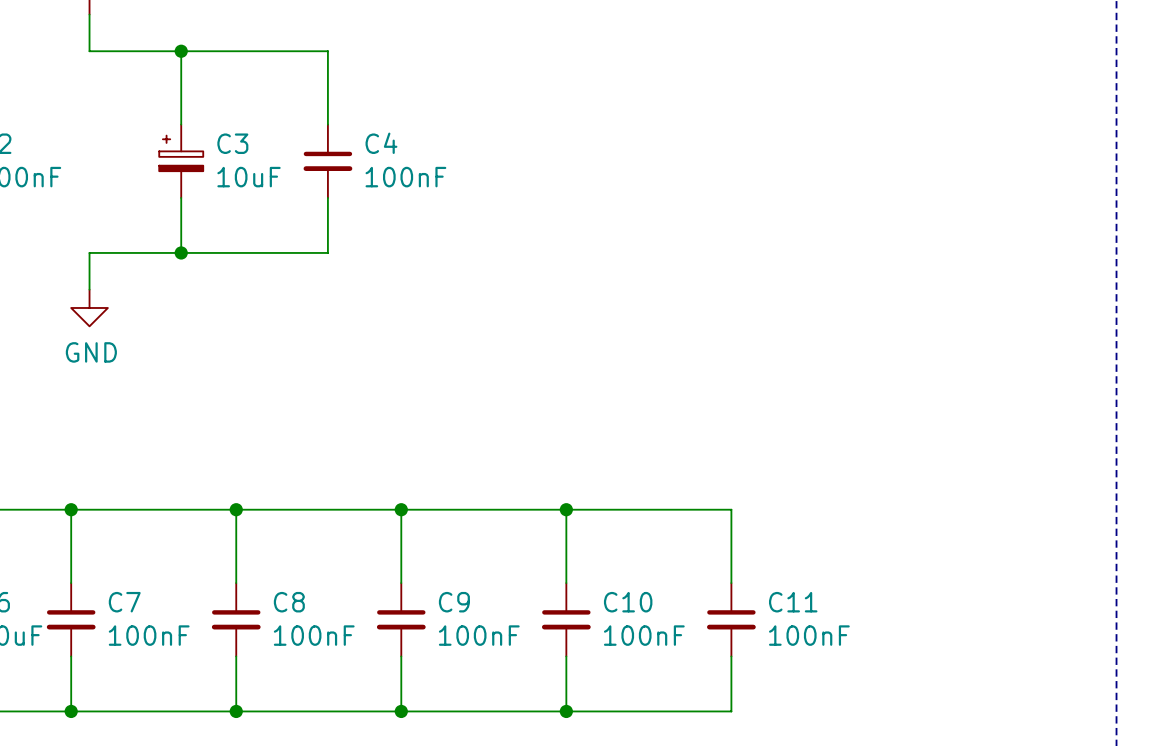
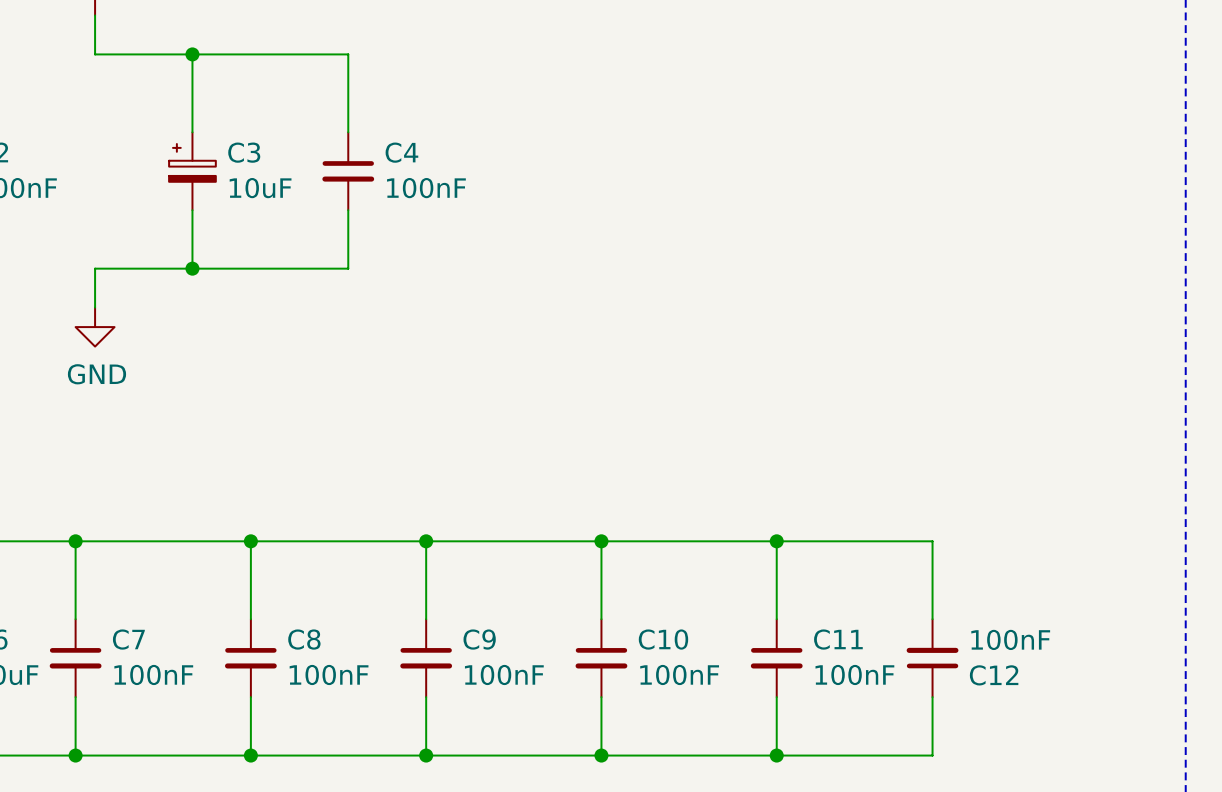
wire: none -> (776, 541) (932, 541) (932, 619)
junction: none -> (776, 541)
C12: none -> 100nF (932, 658)
wire: none -> (932, 697) (932, 755) (776, 755)
junction: none -> (776, 755)

